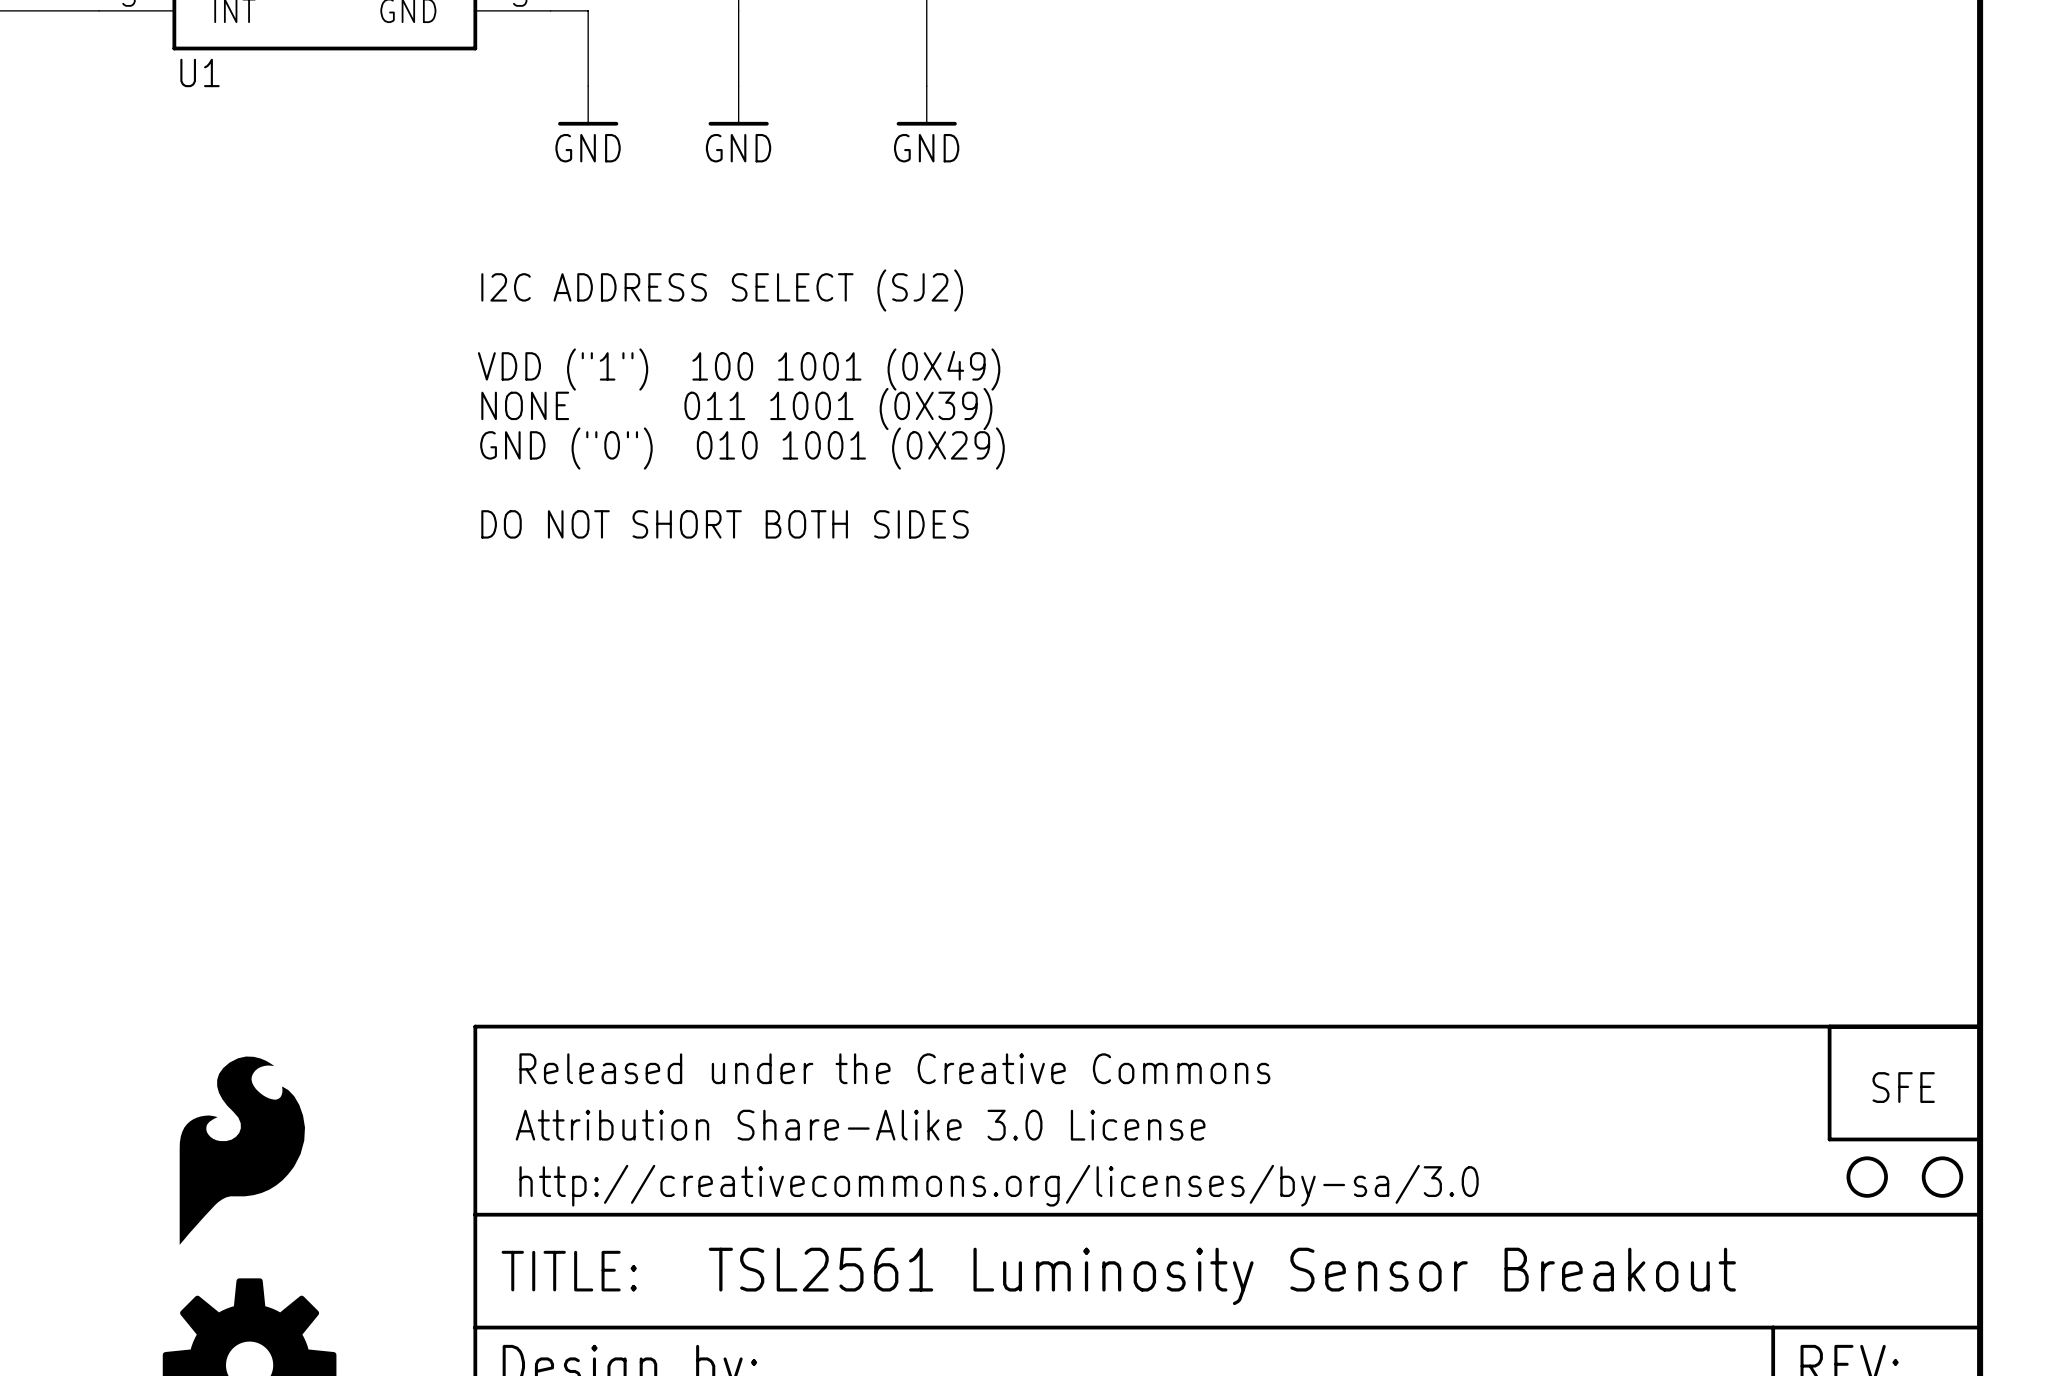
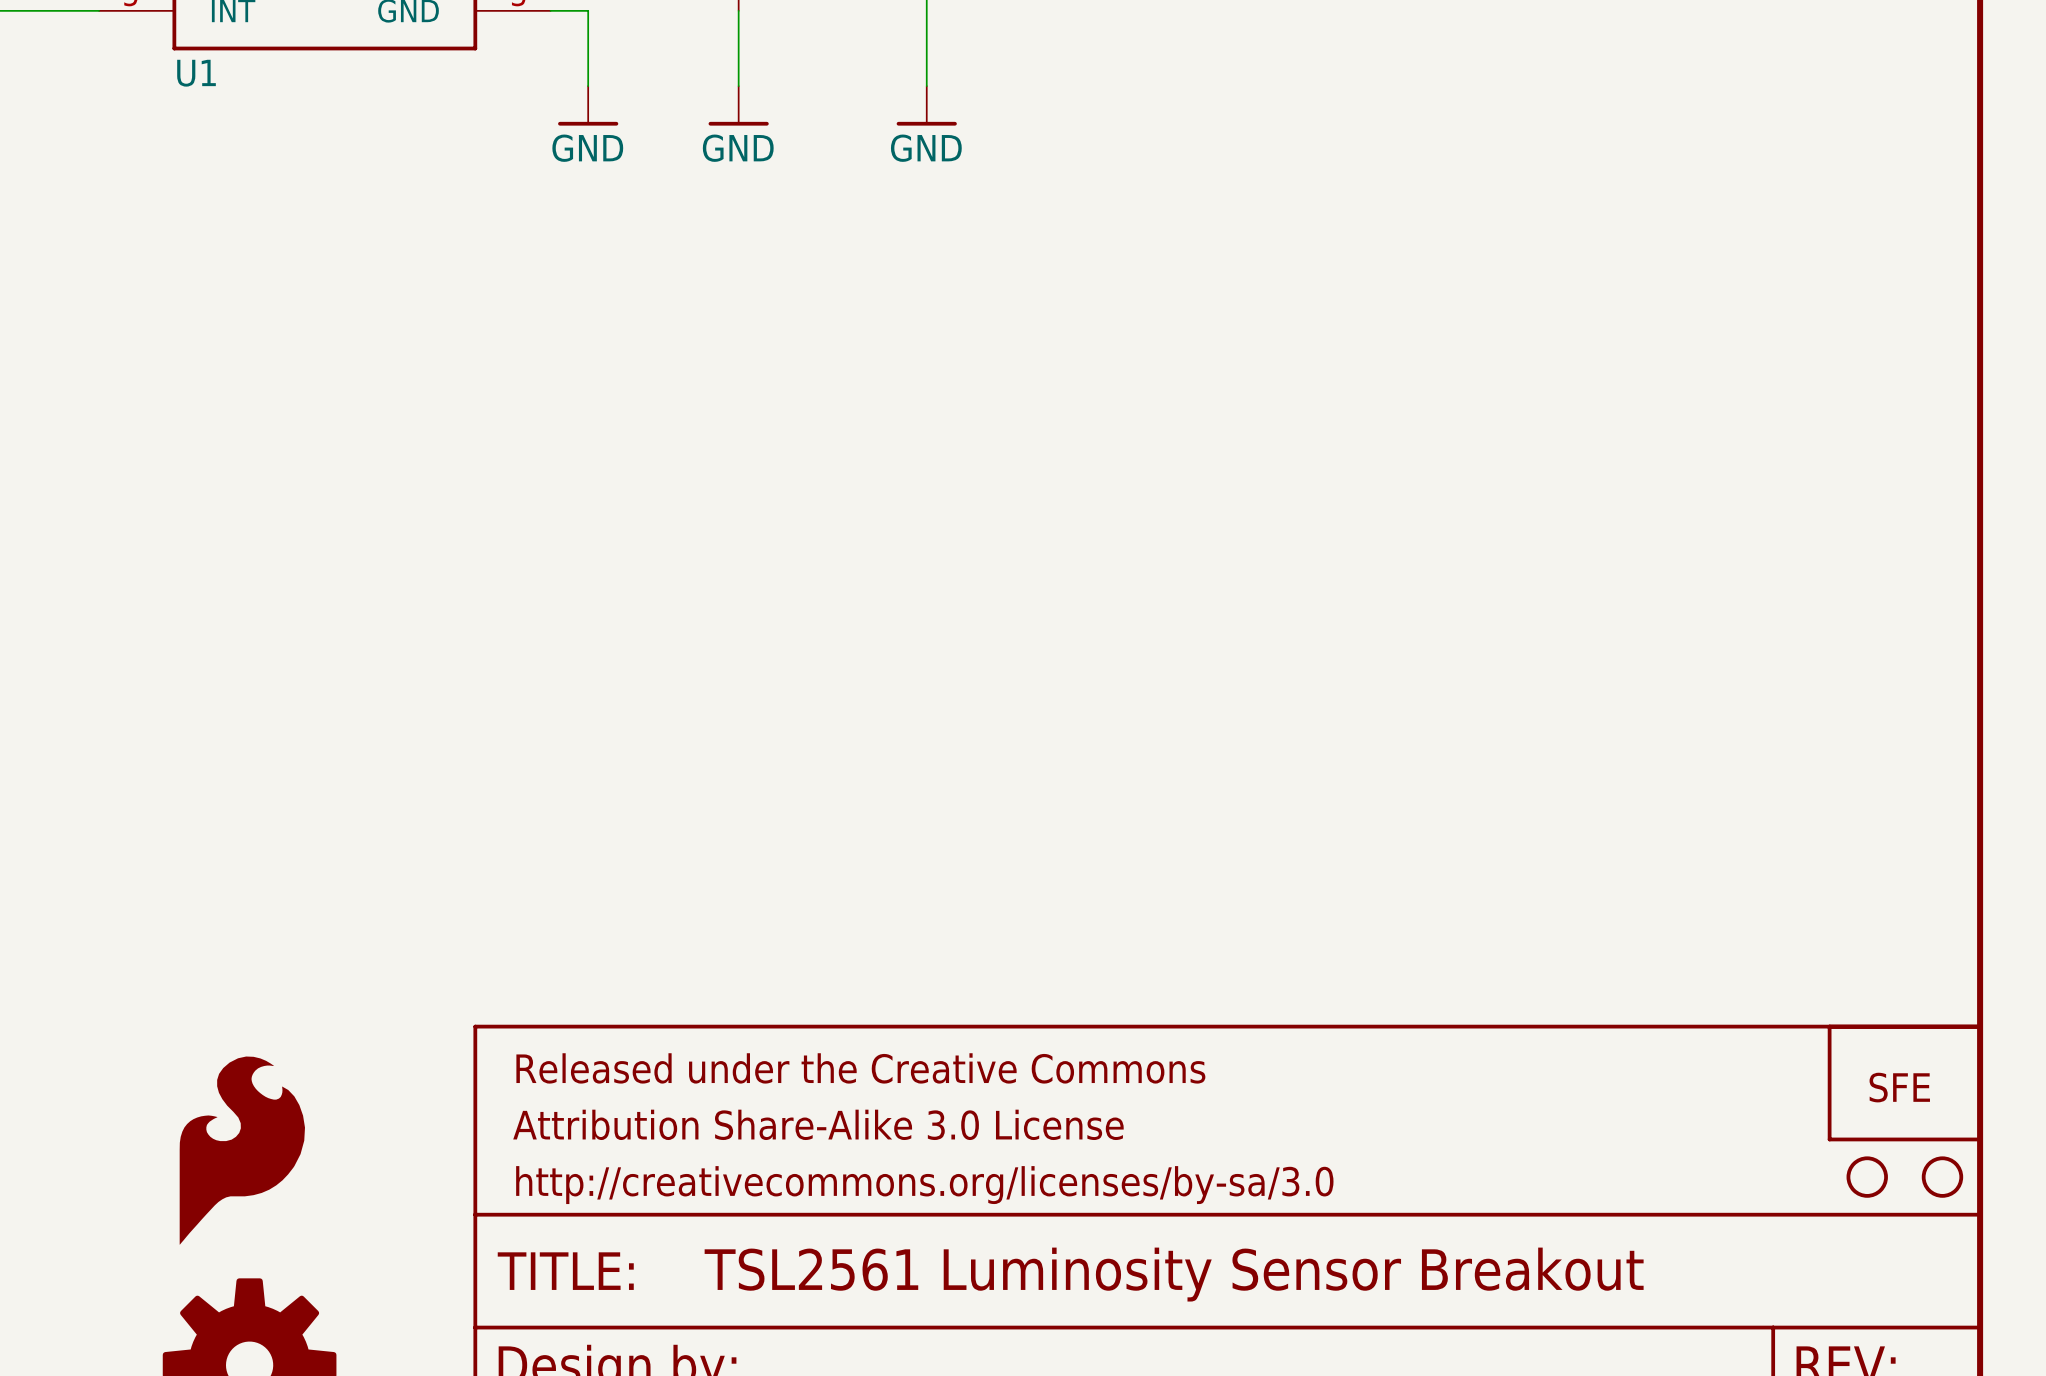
text: I2C ADDRESS SELECT (SJ2) (722, 290) -> none
text: VDD ("1") 100 1001 (0X49) (739, 369) -> none
text: NONE 011 1001 (0X39) (736, 409) -> none
text: GND ("0") 010 1001 (0X29) (742, 448) -> none
text: DO NOT SHORT BOTH SIDES (724, 524) -> none

